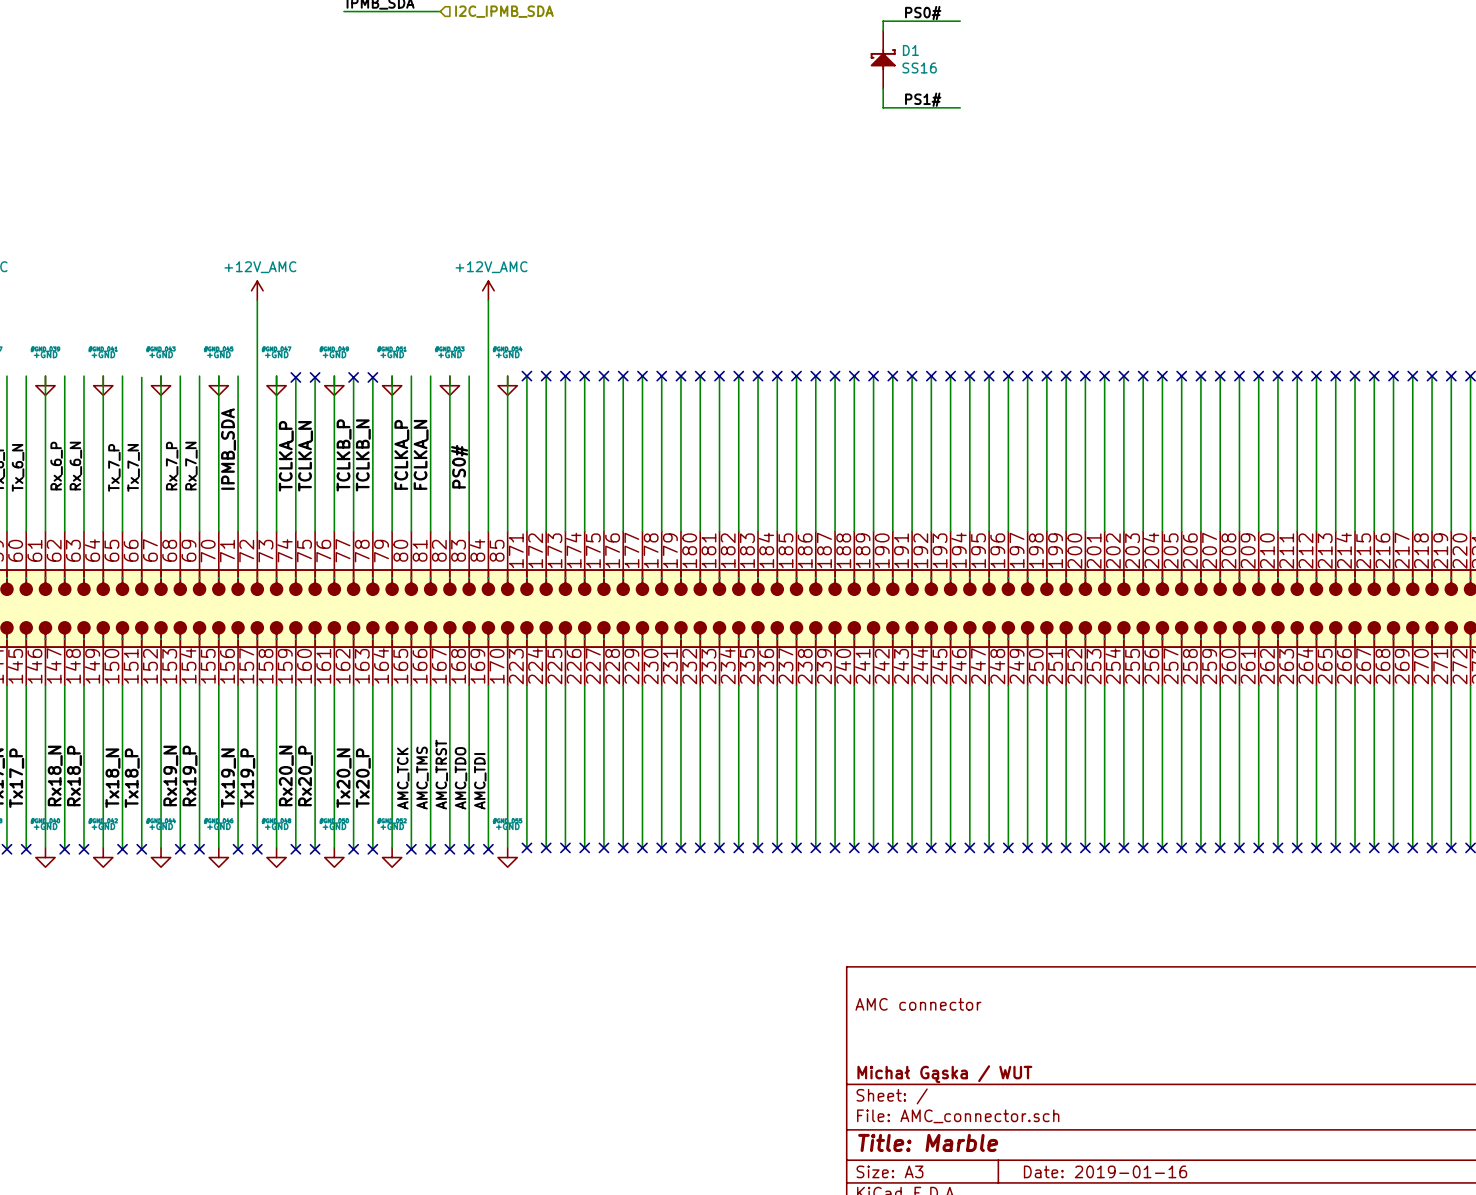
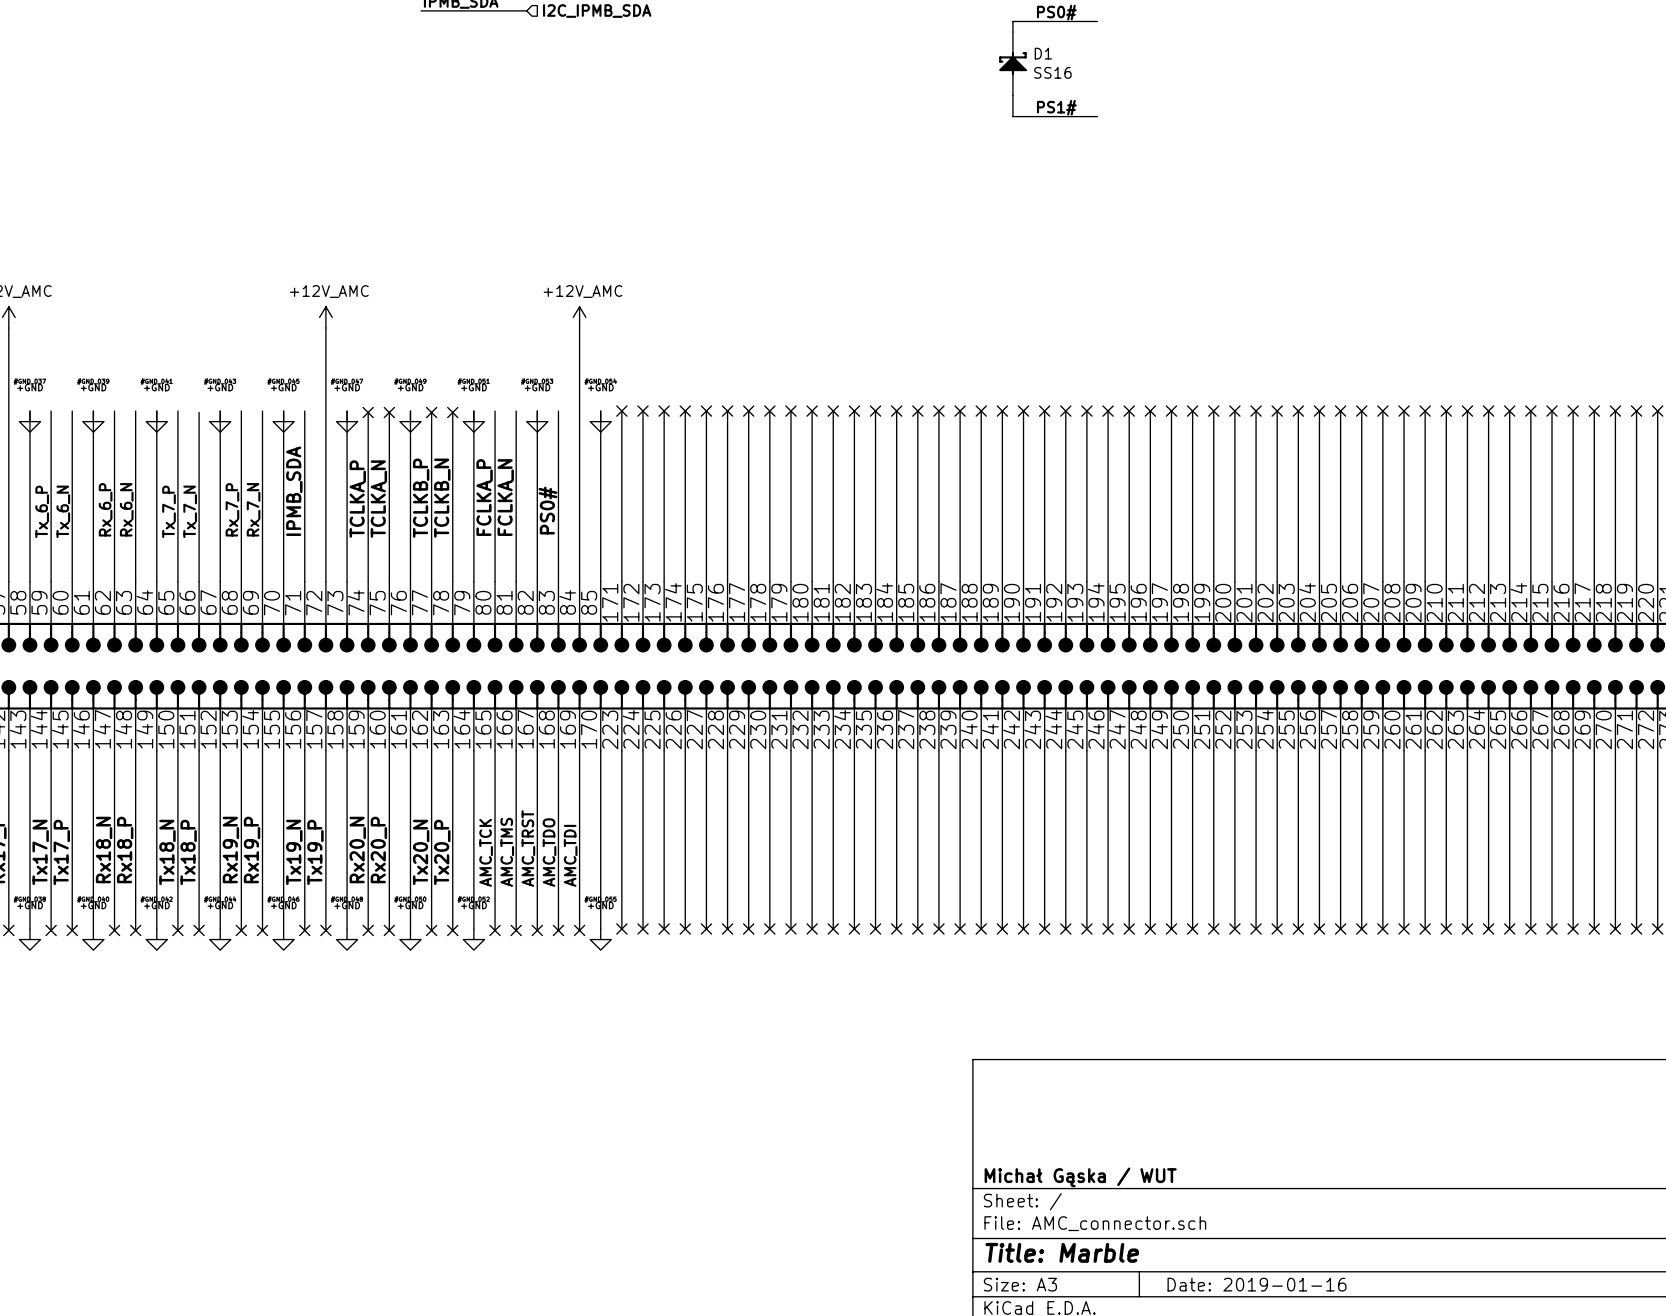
title block: AMC connector (918, 1004) -> none

